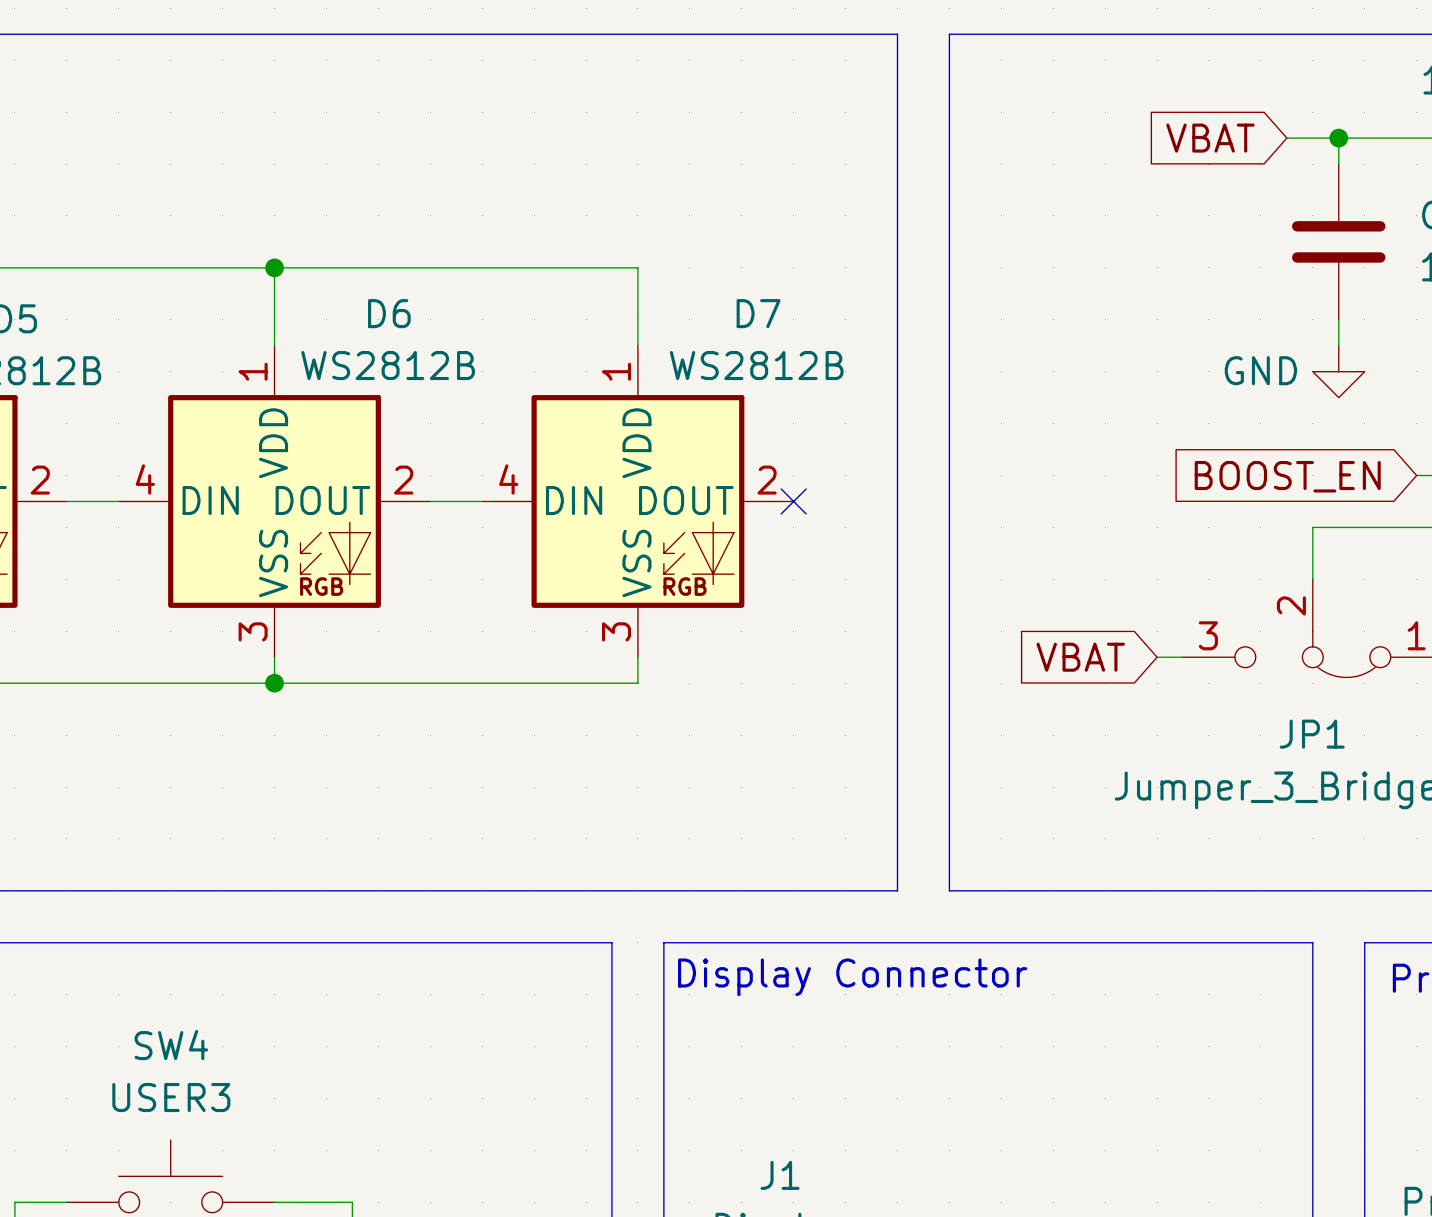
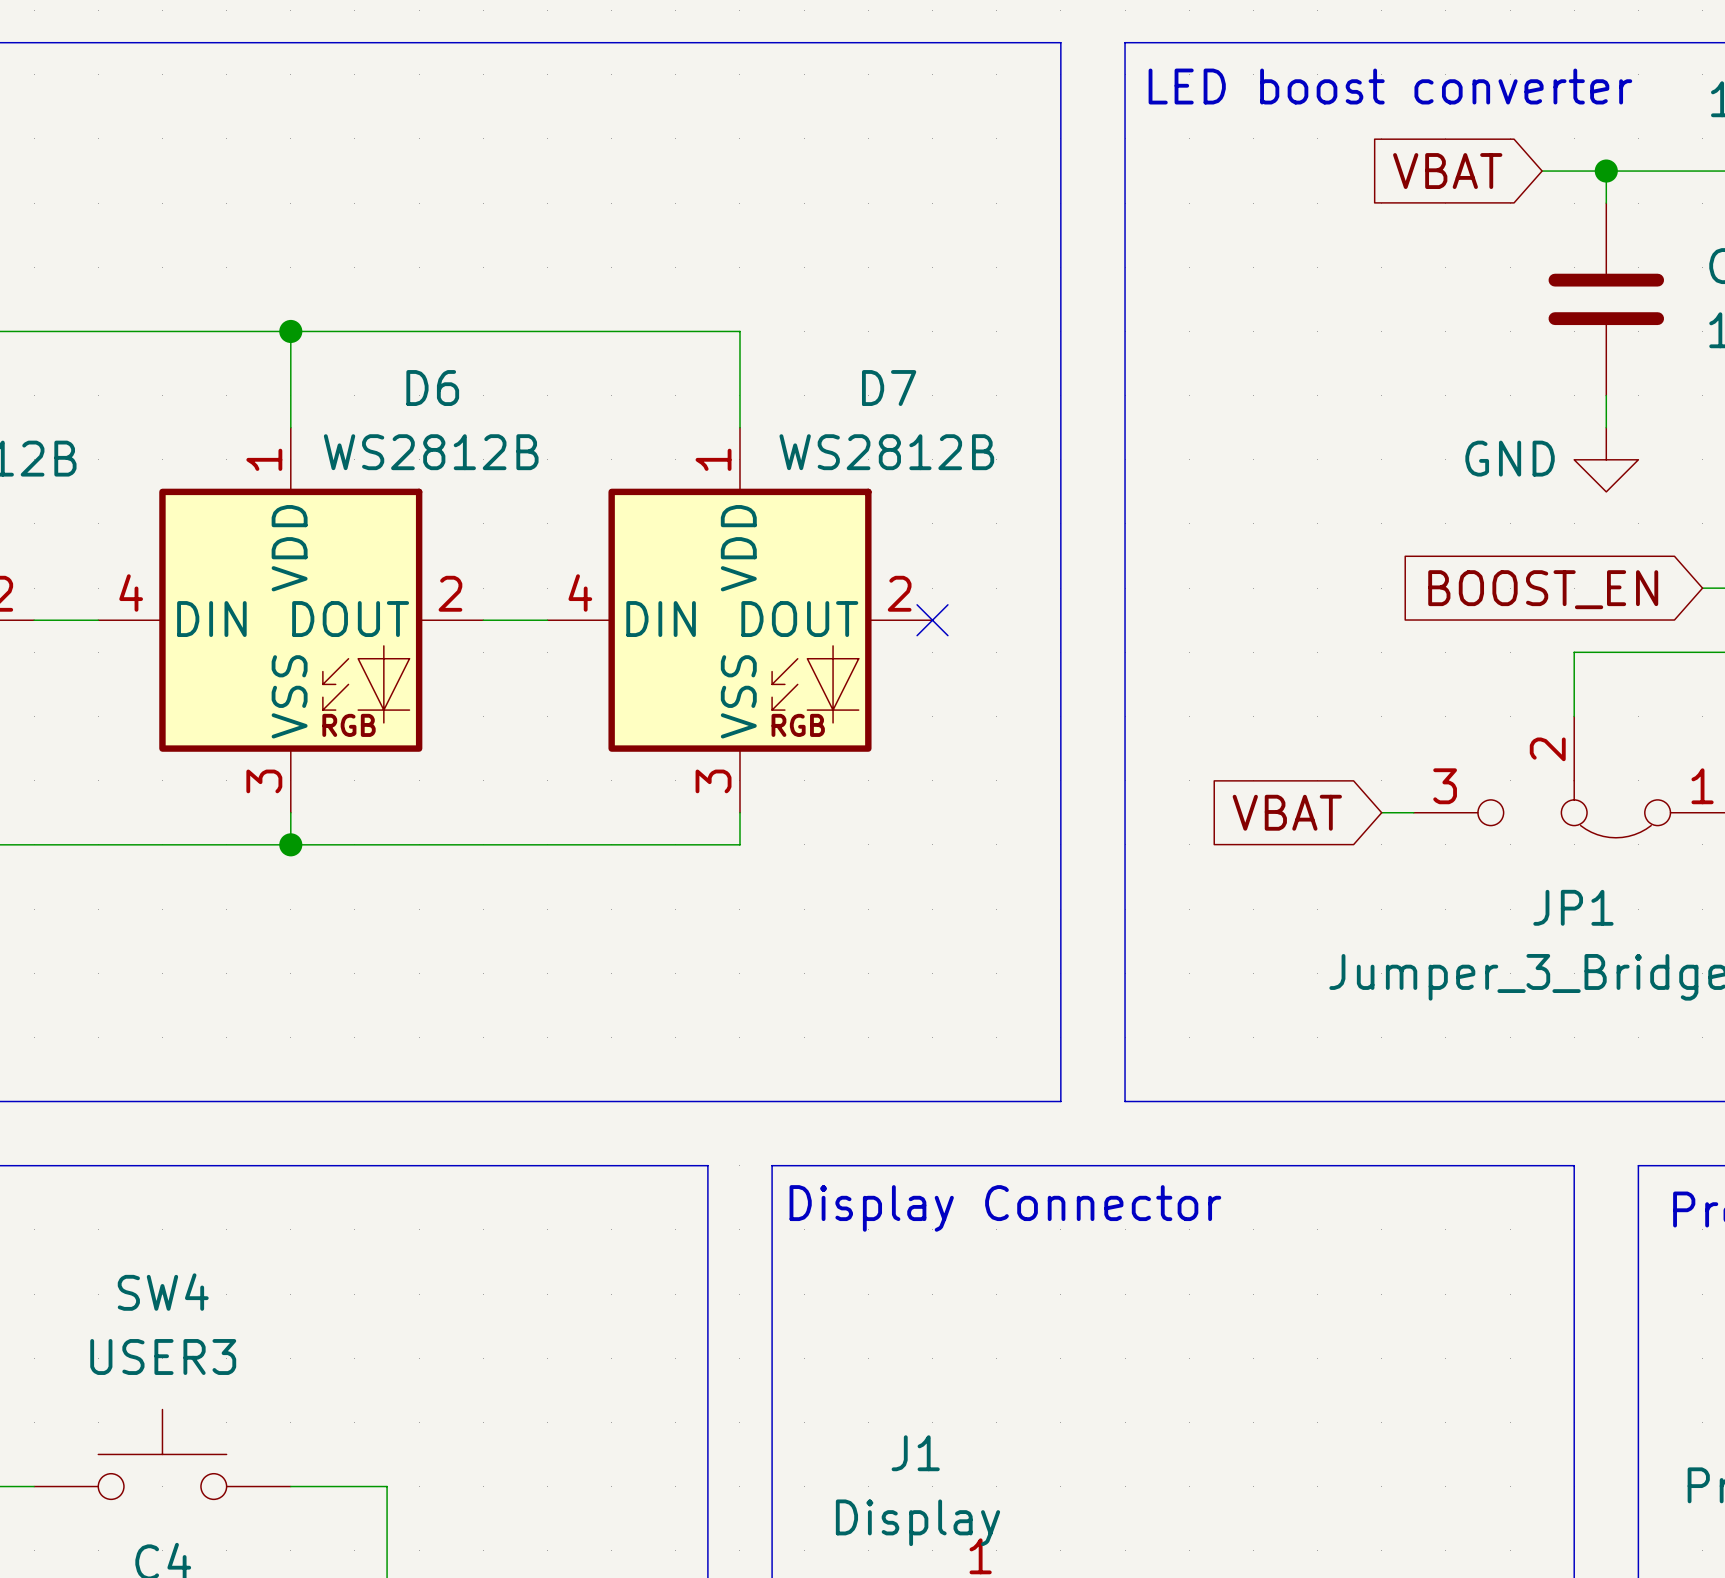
text: none -> LED boost converter (1390, 86)

